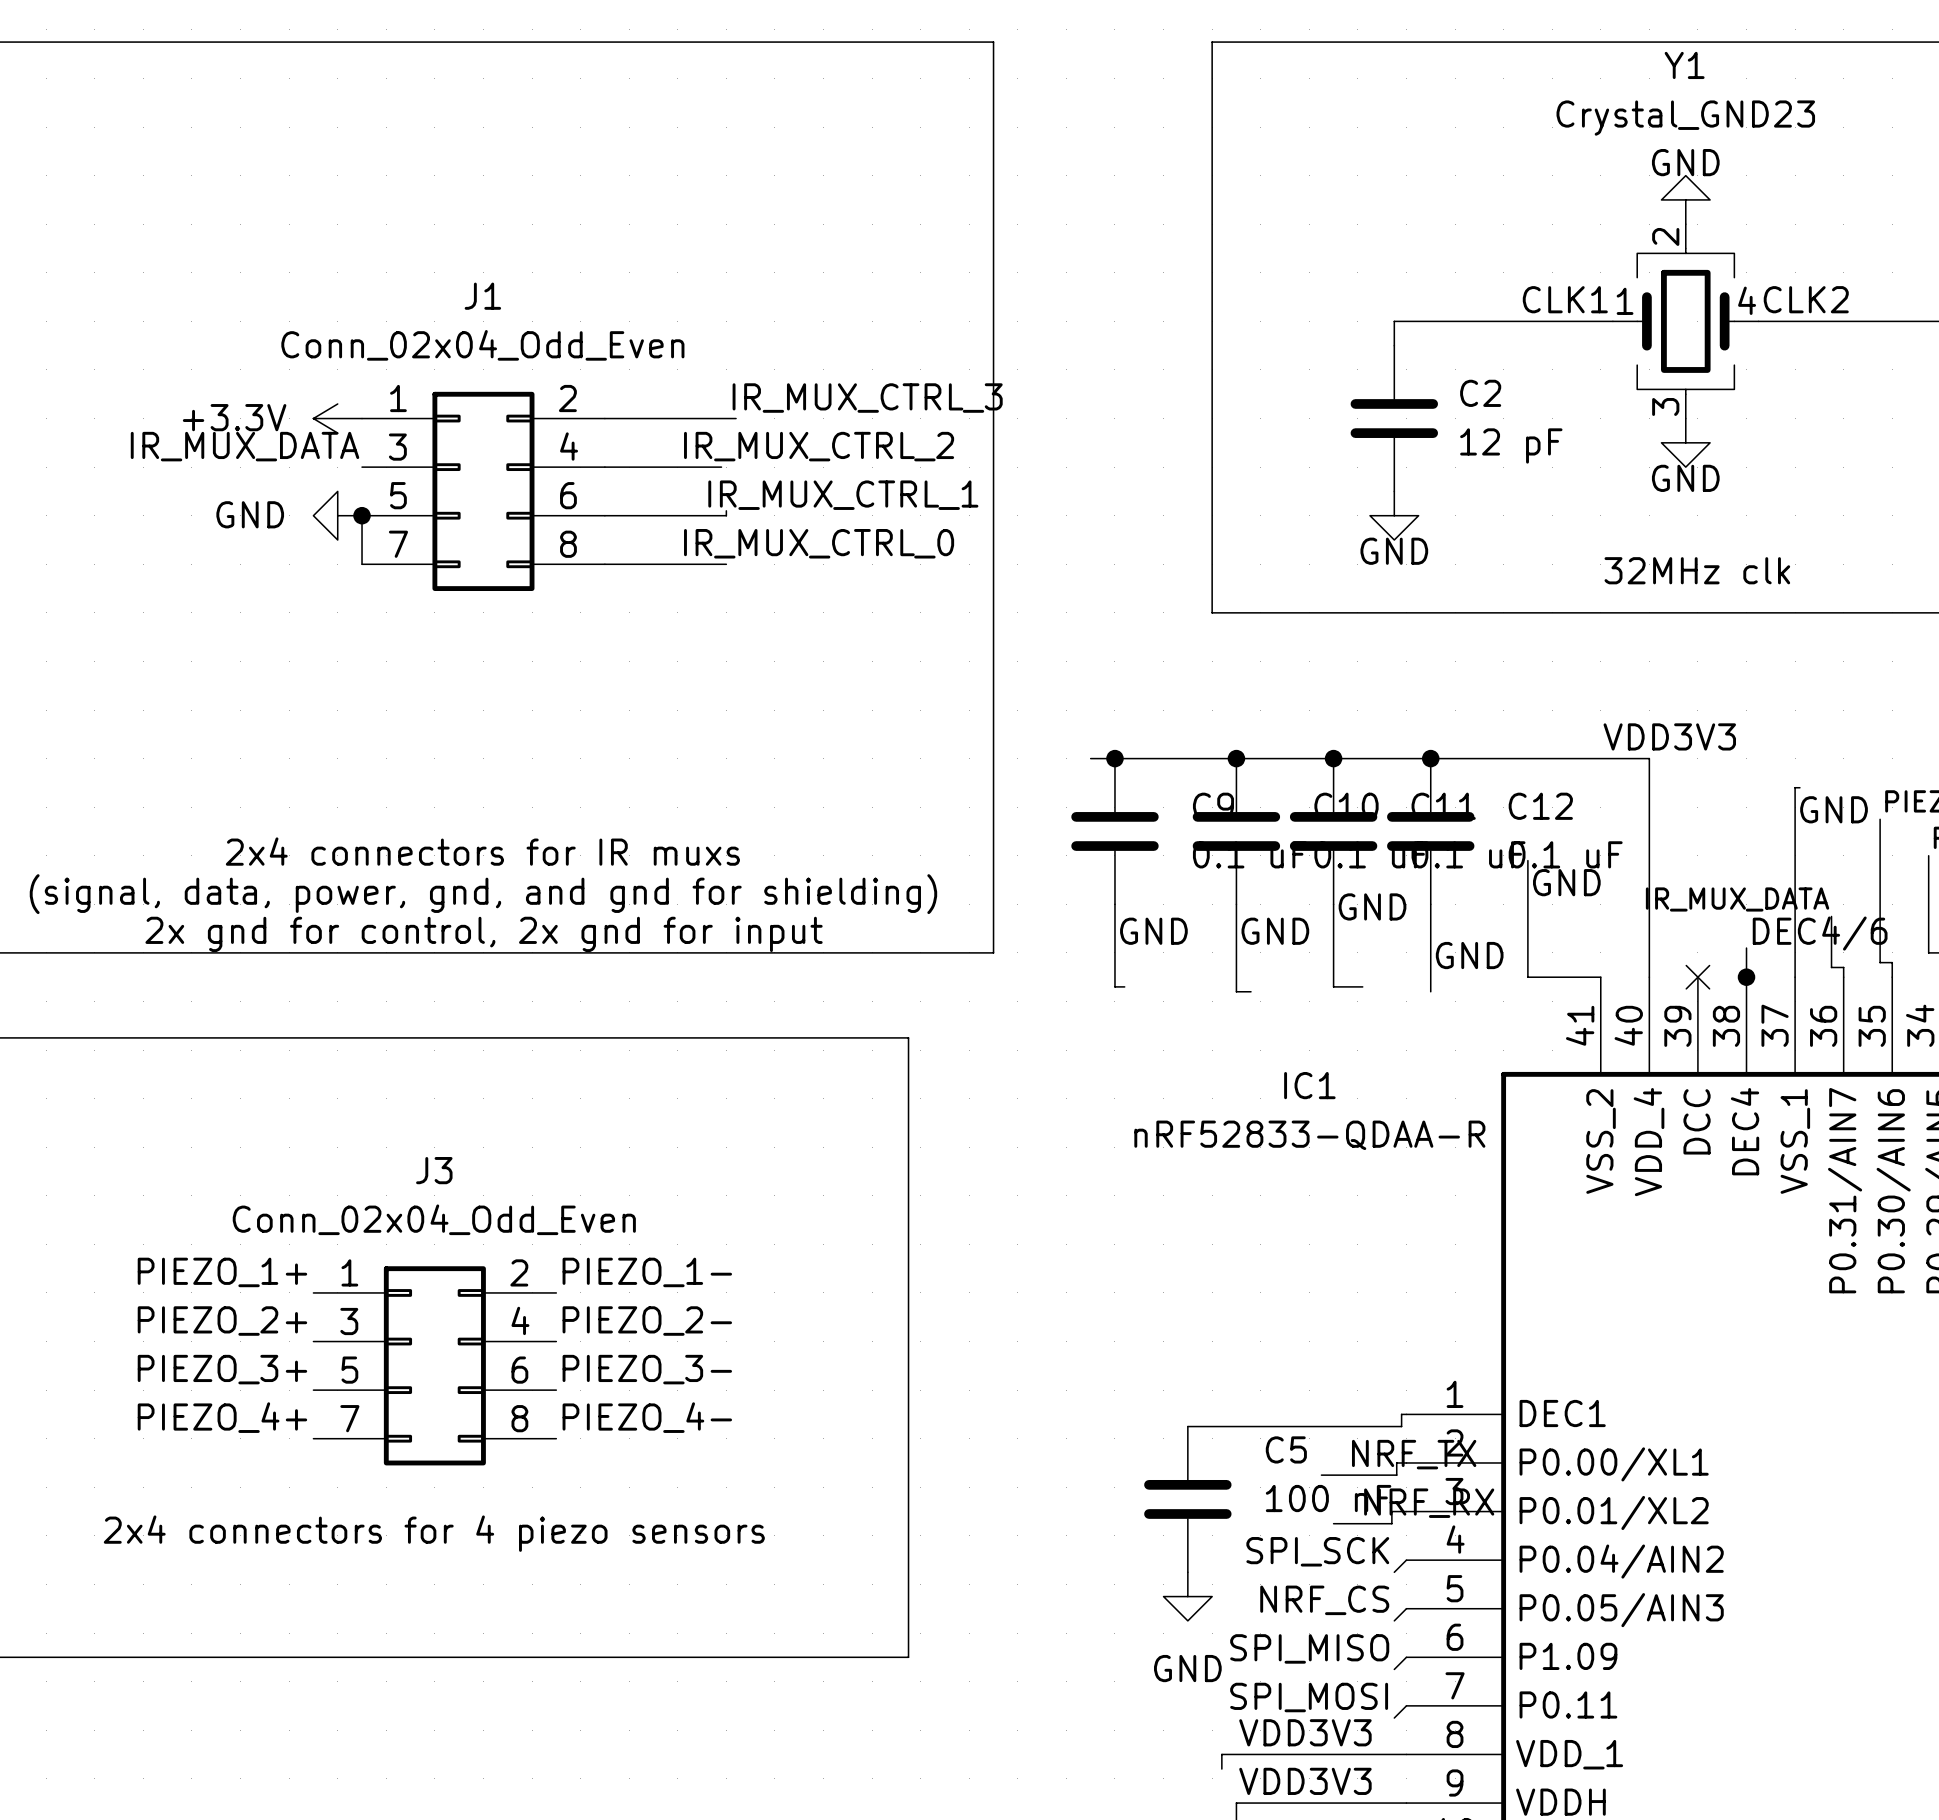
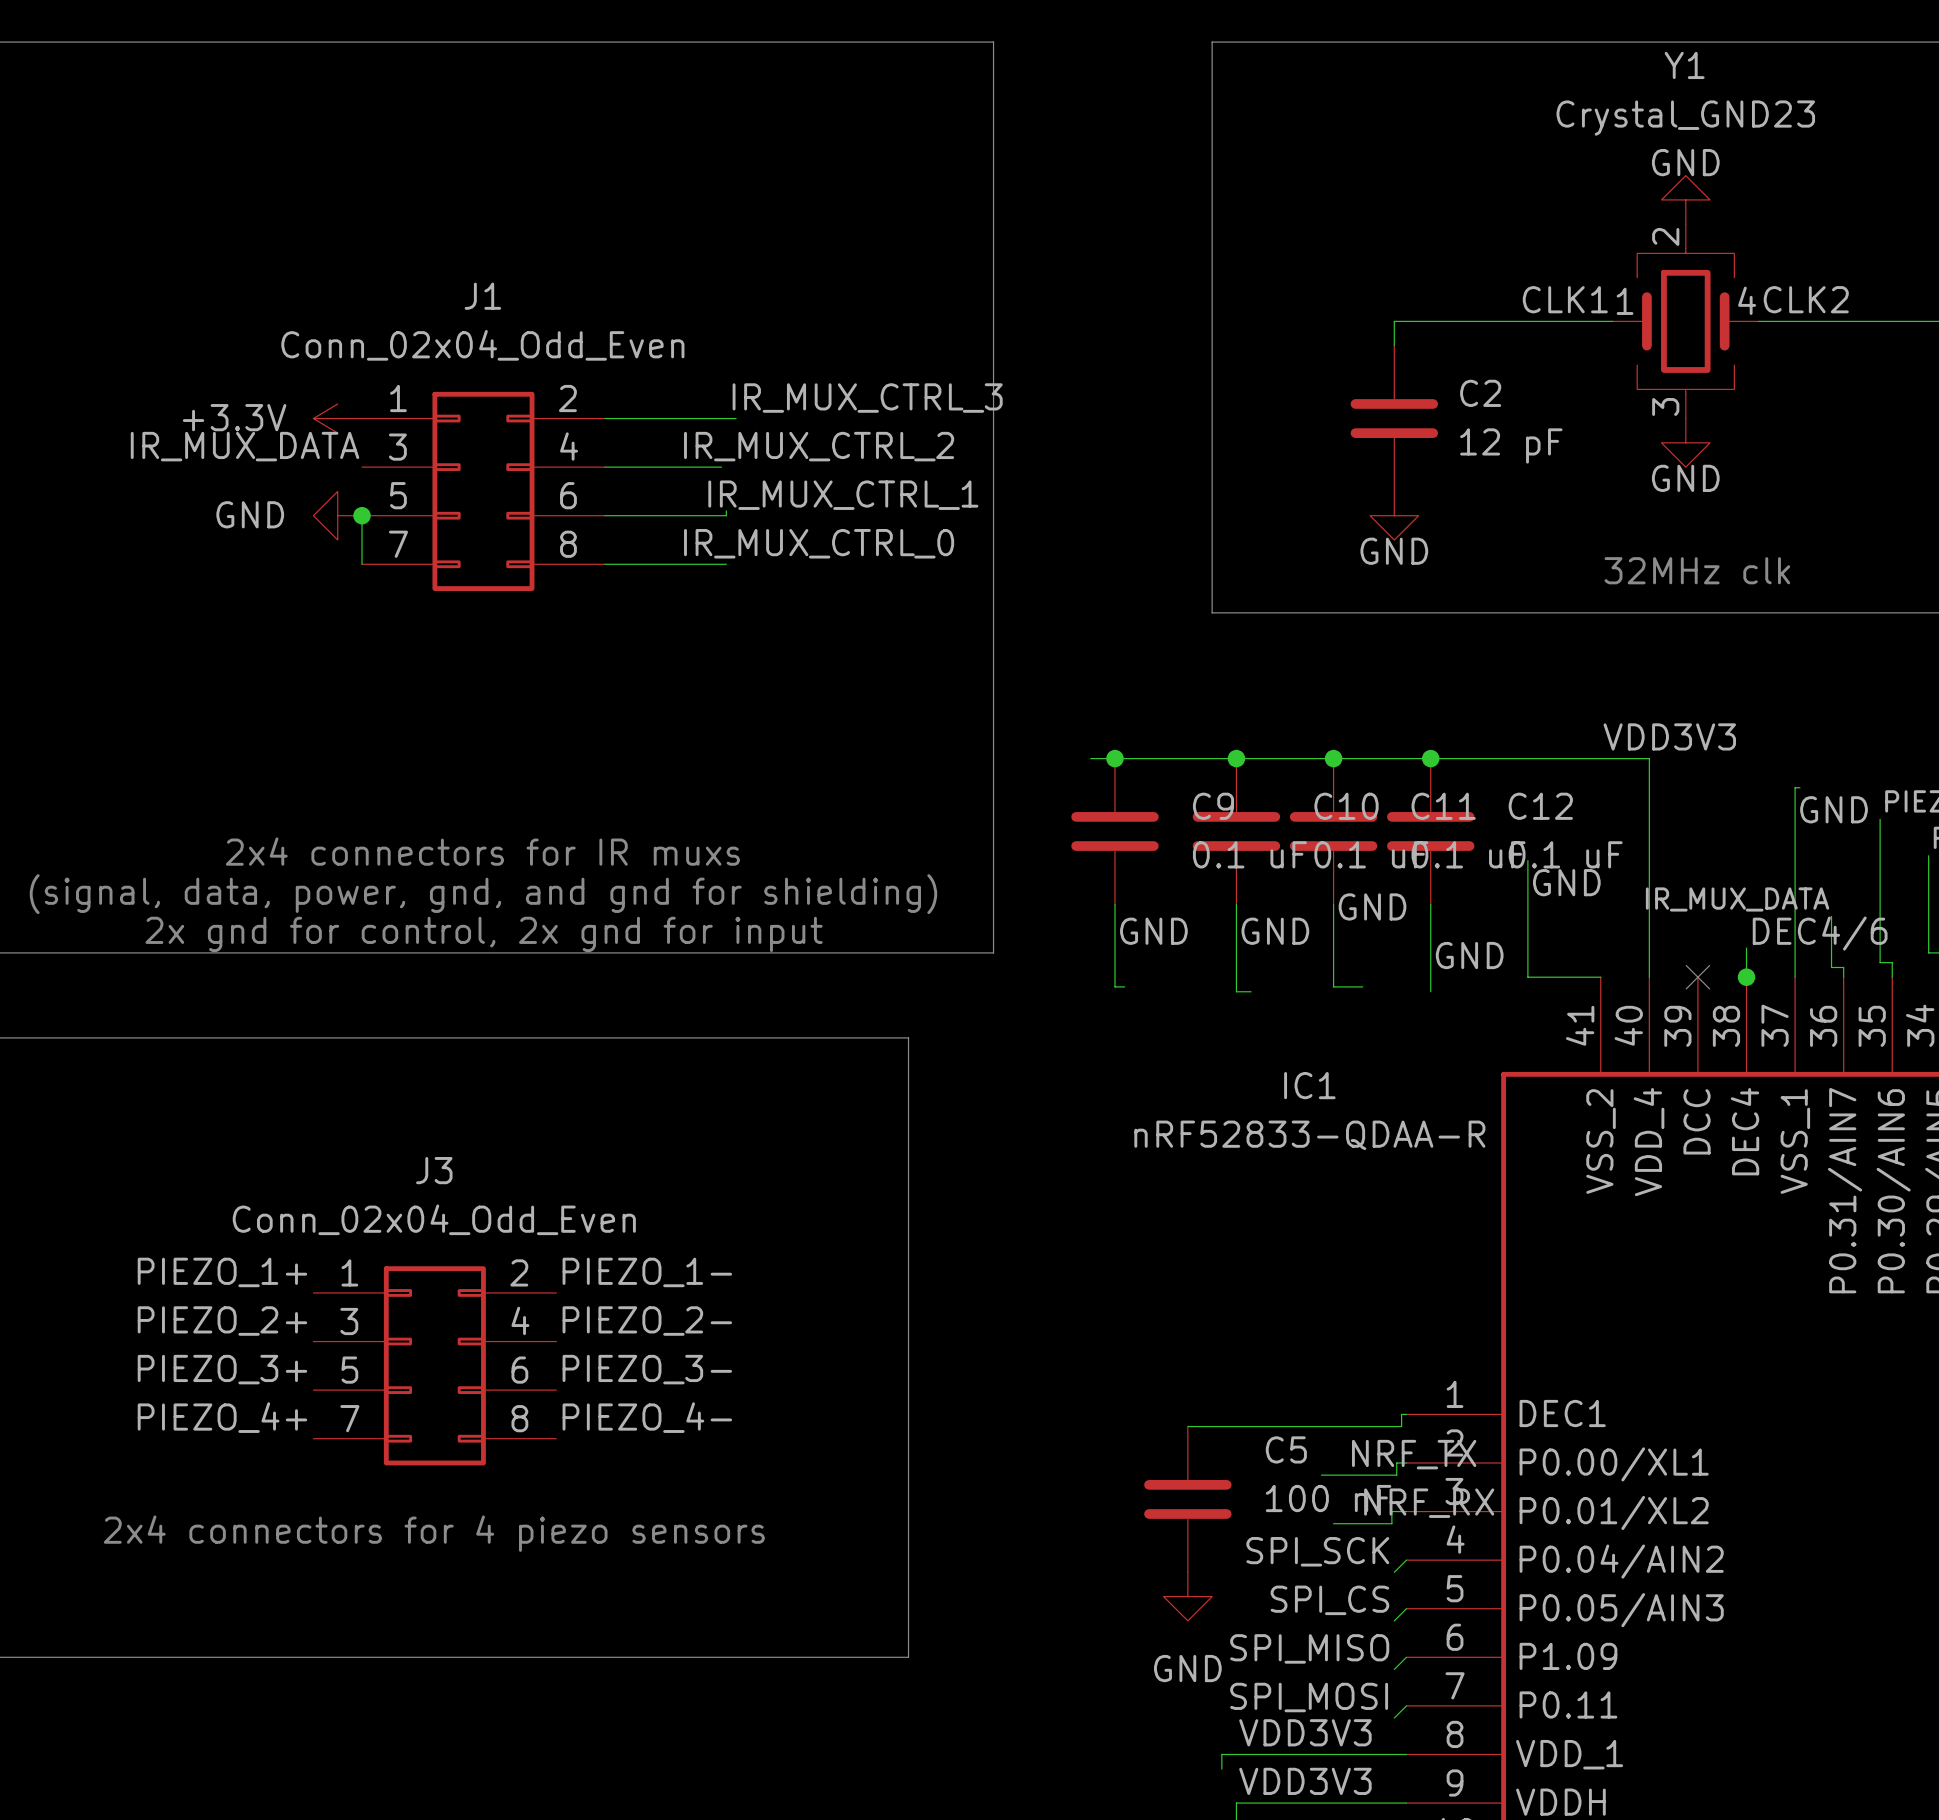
label: NRF_CS (1324, 1600) -> SPI_CS (1329, 1600)

